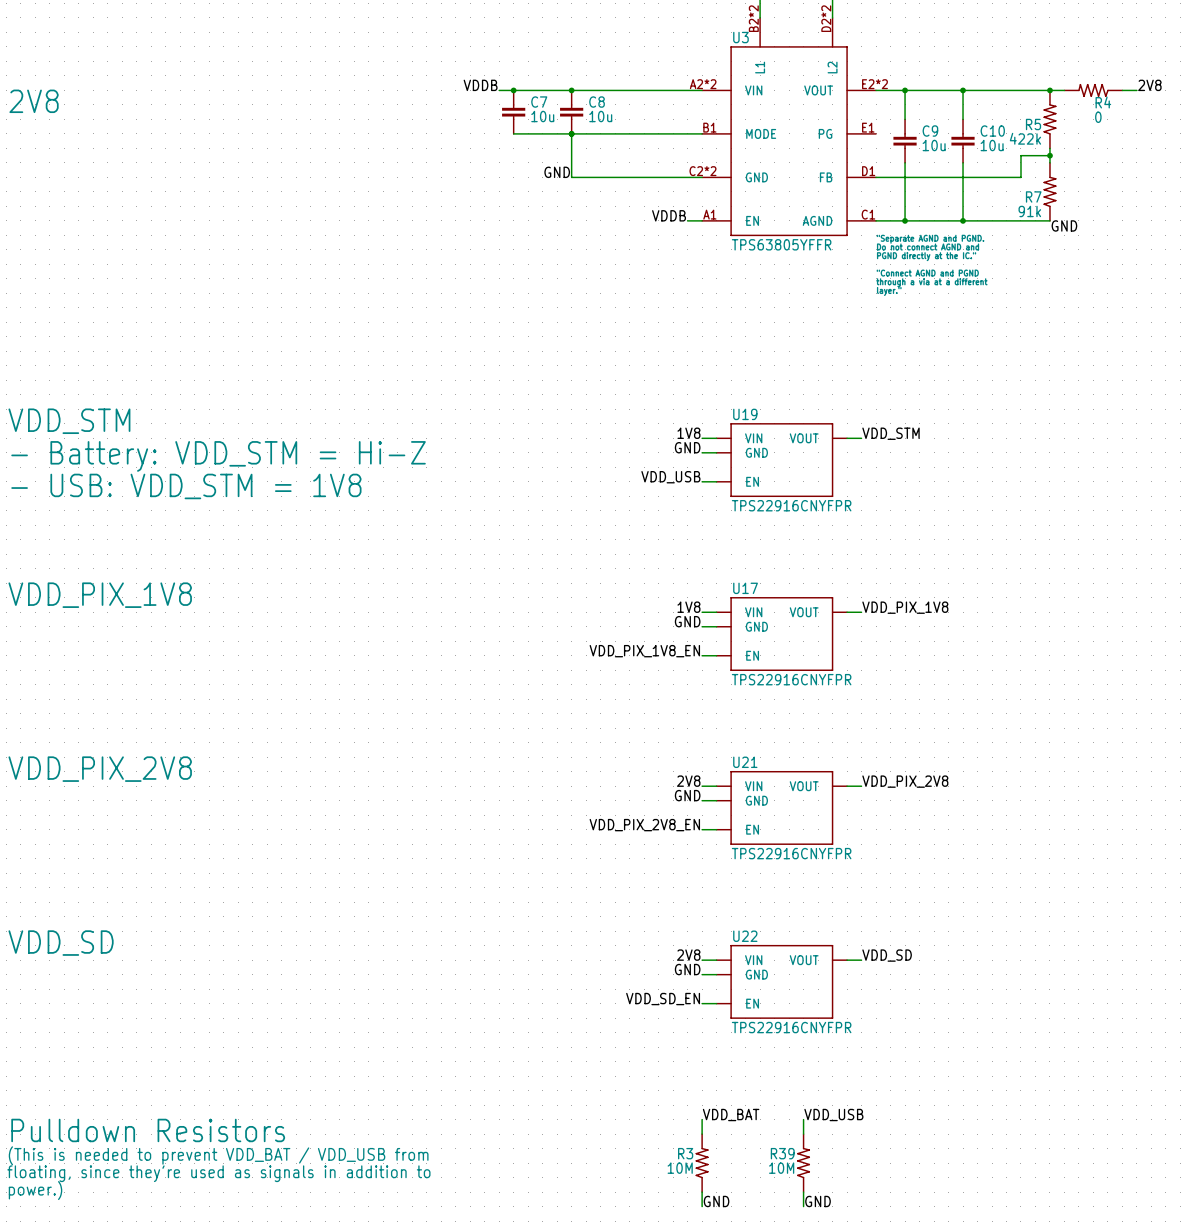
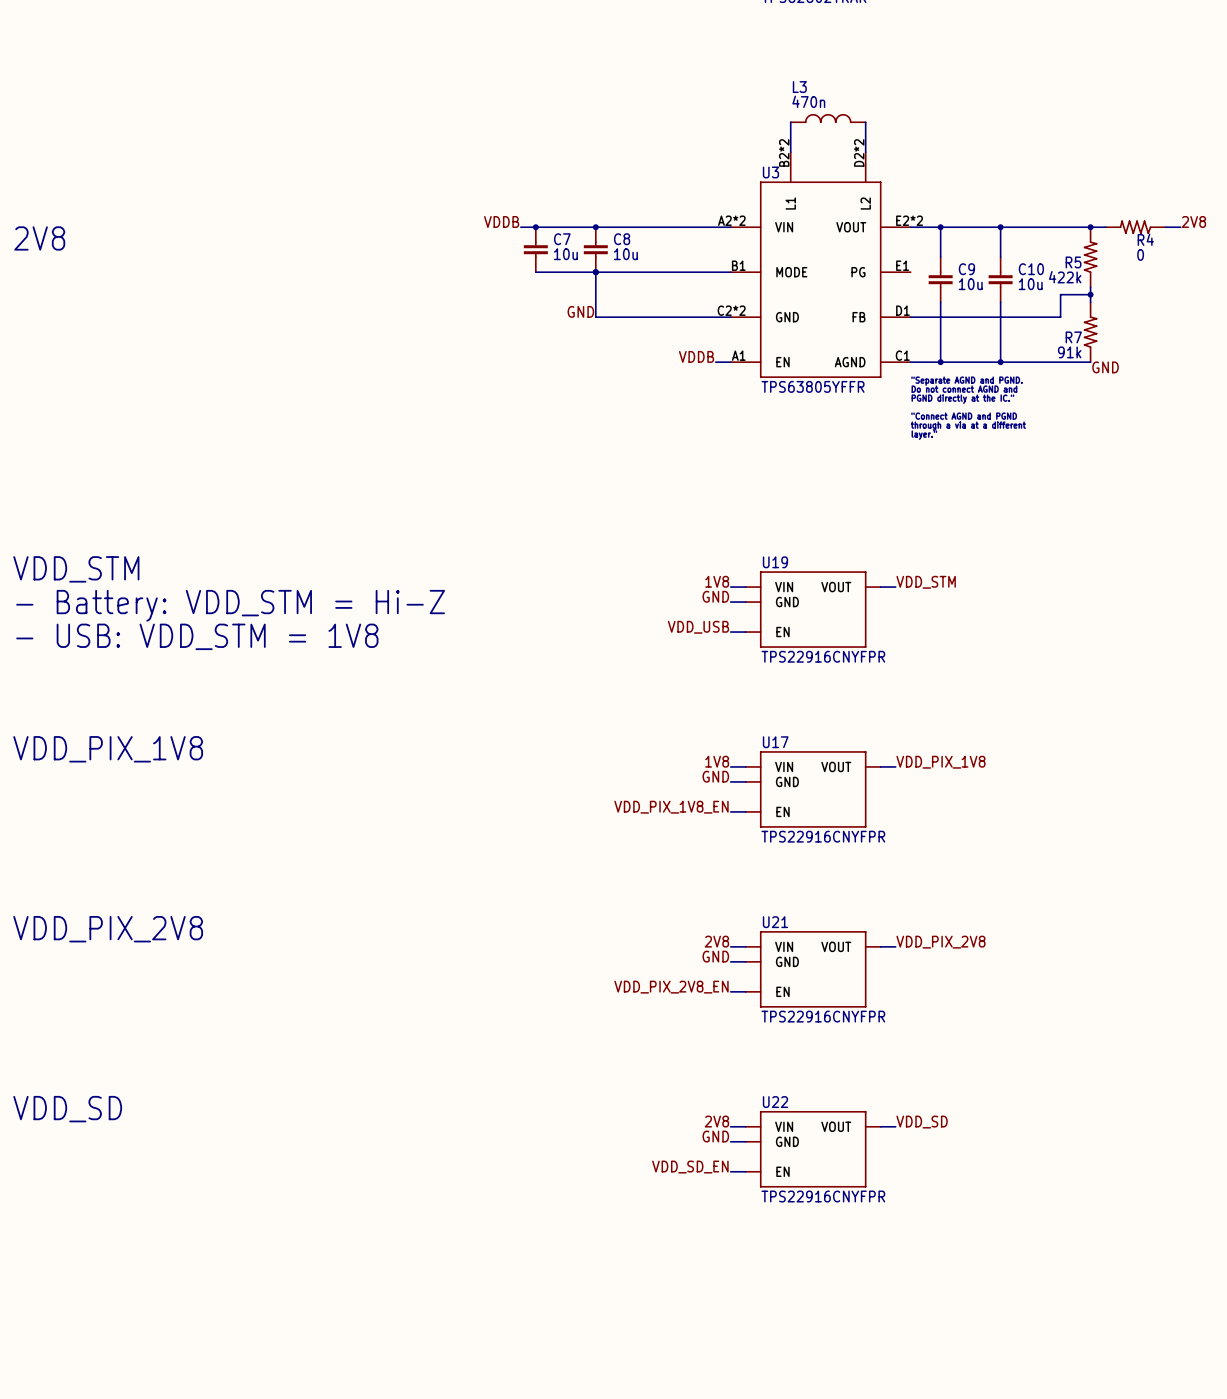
label: VDD_BAT (731, 1115) -> none
label: VDD_USB (833, 1115) -> none
wire: (702, 1119) (702, 1134) -> none
wire: (803, 1119) (803, 1134) -> none
text: Pulldown Resistors (148, 1130) -> none
text: (This is needed to prevent VDD_BAT / VDD_USB from (218, 1155) -> none
R3: 10M (702, 1163) -> none
R39: 10M (803, 1163) -> none
text: floating, since they're used as signals in addition to (218, 1173) -> none
text: power.) (35, 1190) -> none
wire: (702, 1192) (702, 1206) -> none
wire: (803, 1192) (803, 1206) -> none
label: GND (716, 1201) -> none
label: GND (818, 1201) -> none

